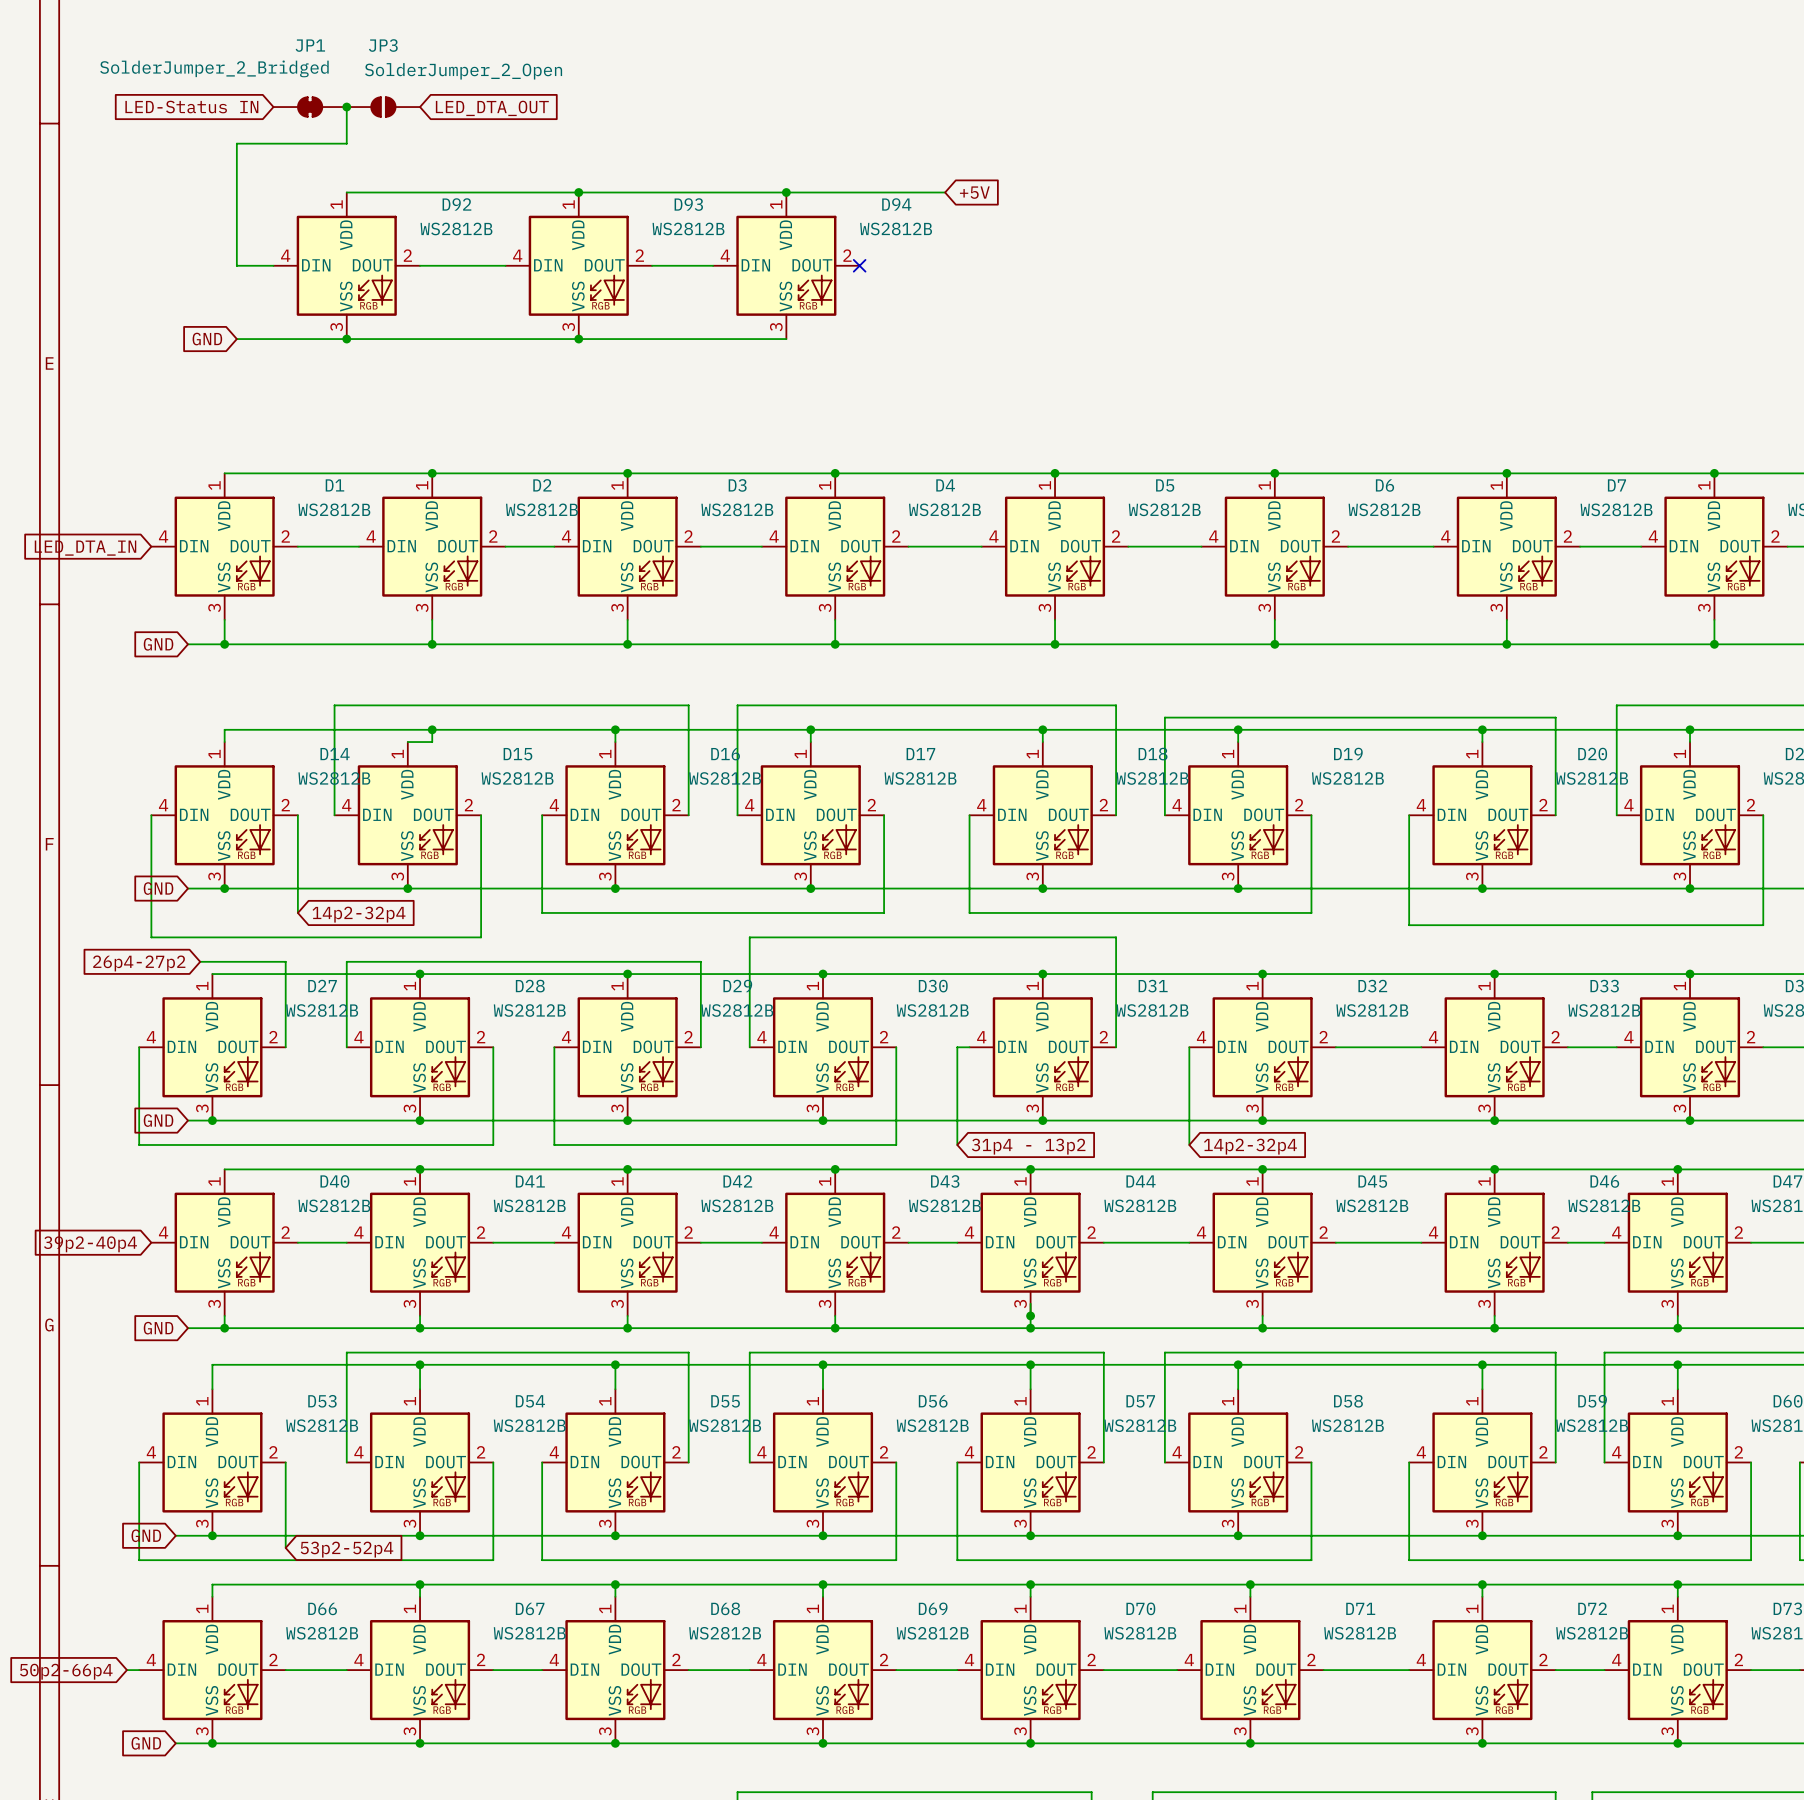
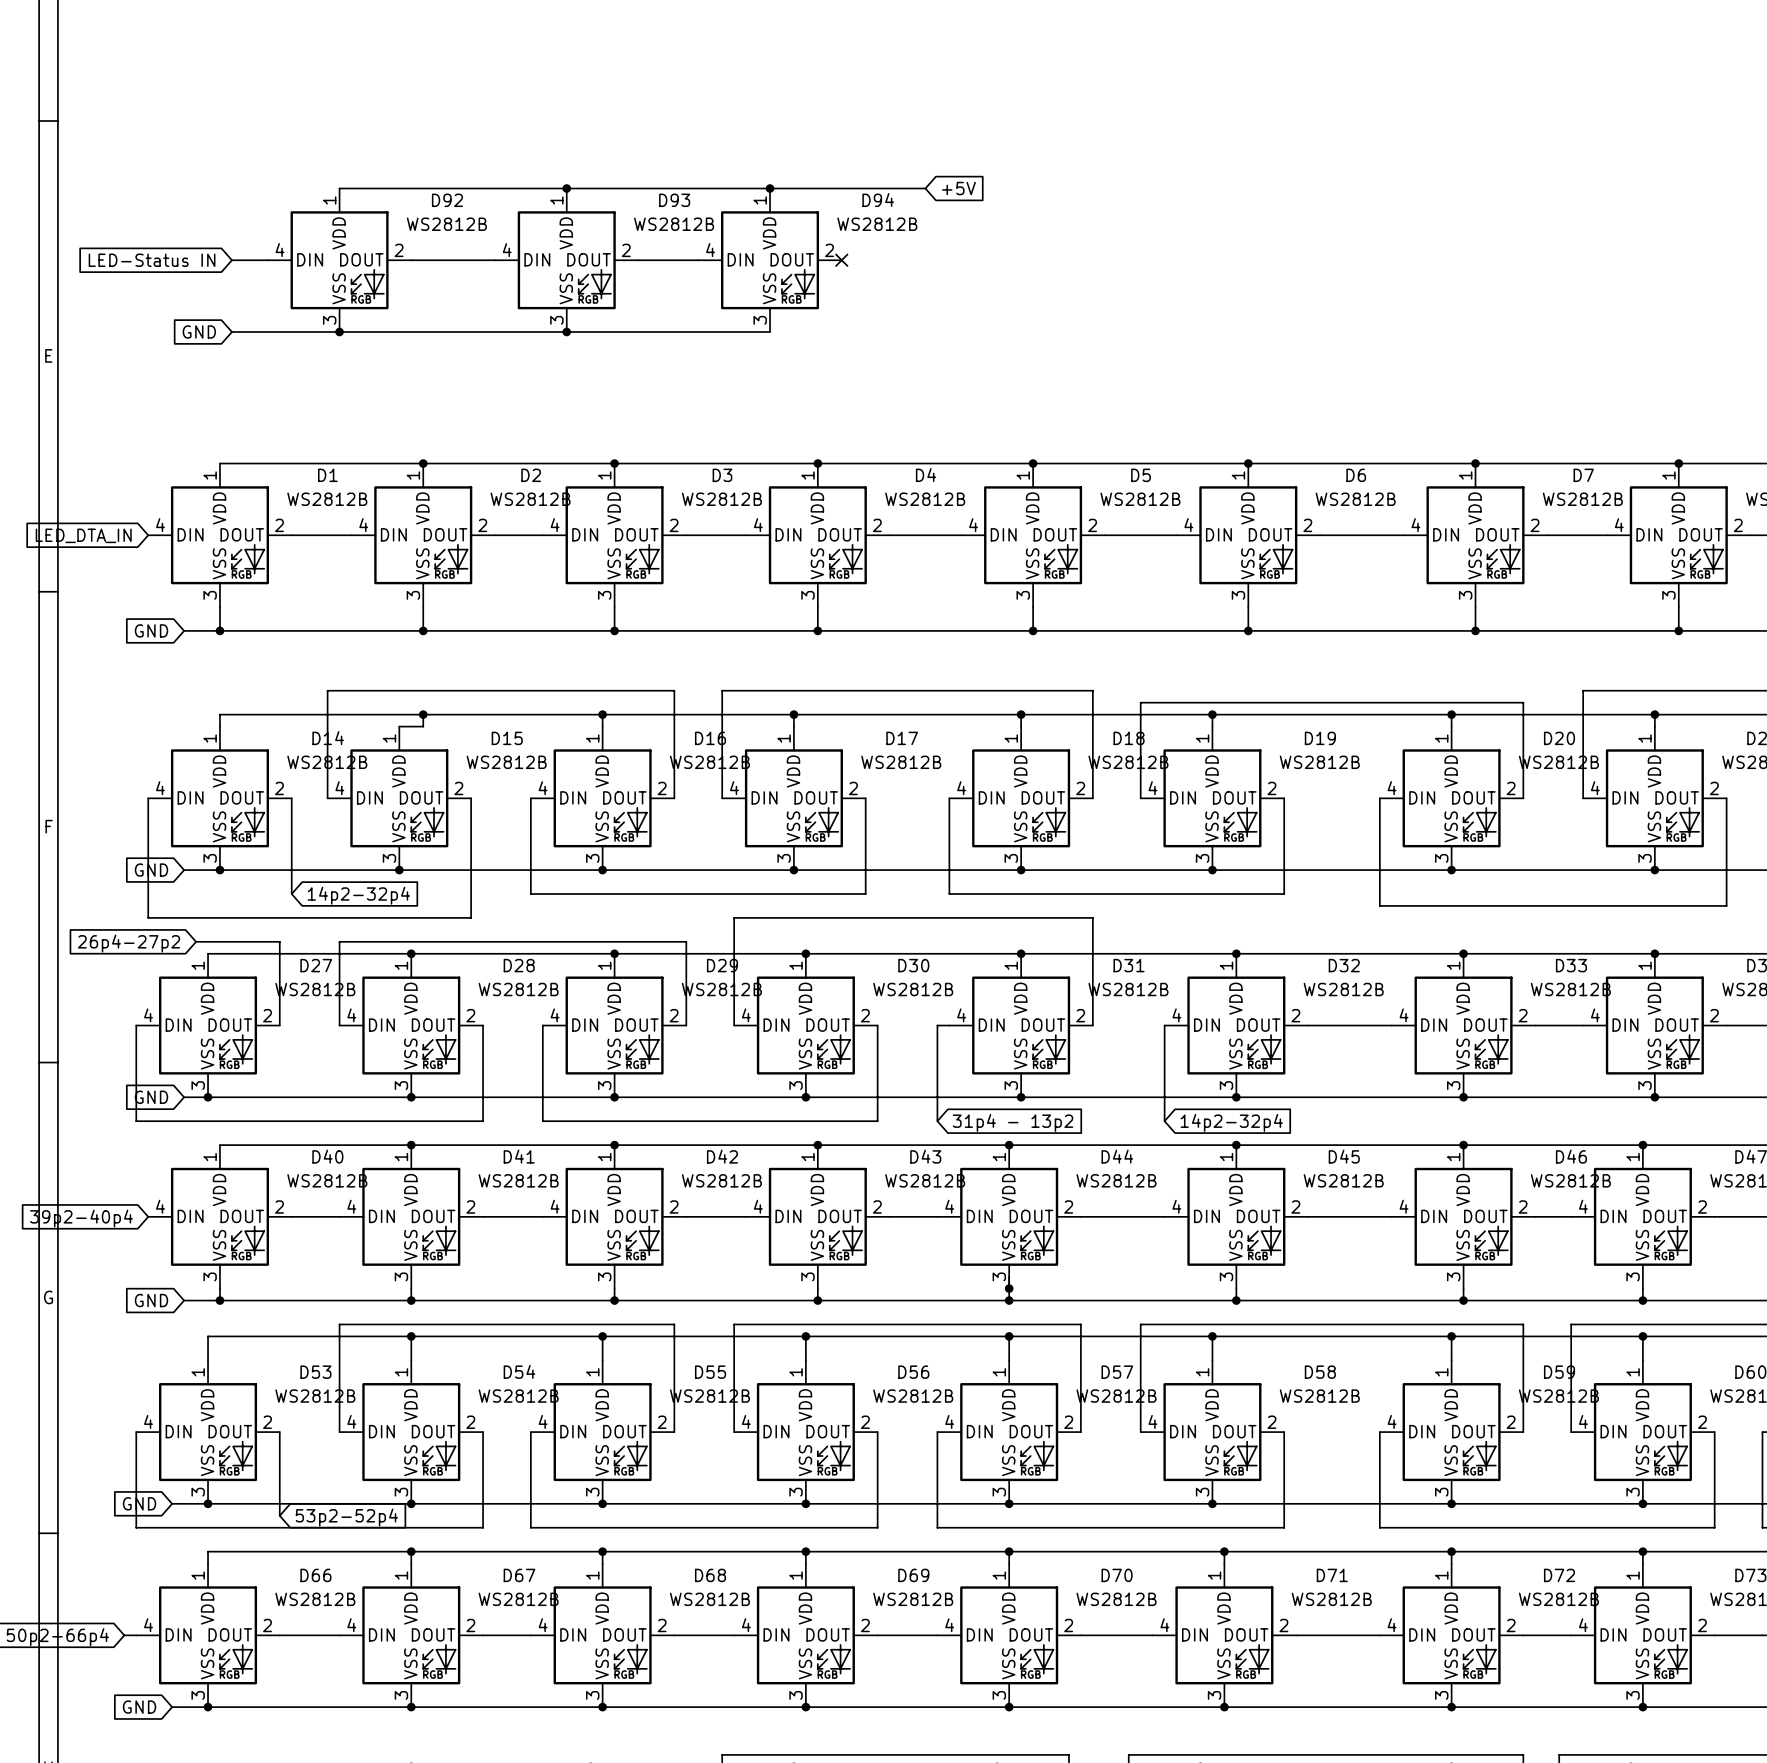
global label position: LED-Status IN (191, 107) -> LED-Status IN (152, 260)
JP1: SolderJumper_2_Bridged (310, 107) -> none
wire: (346, 107) (346, 143) (236, 143) (236, 265) -> none
junction: (346, 107) -> none
JP3: SolderJumper_2_Open (383, 107) -> none
global label: LED_DTA_OUT (492, 108) -> none

